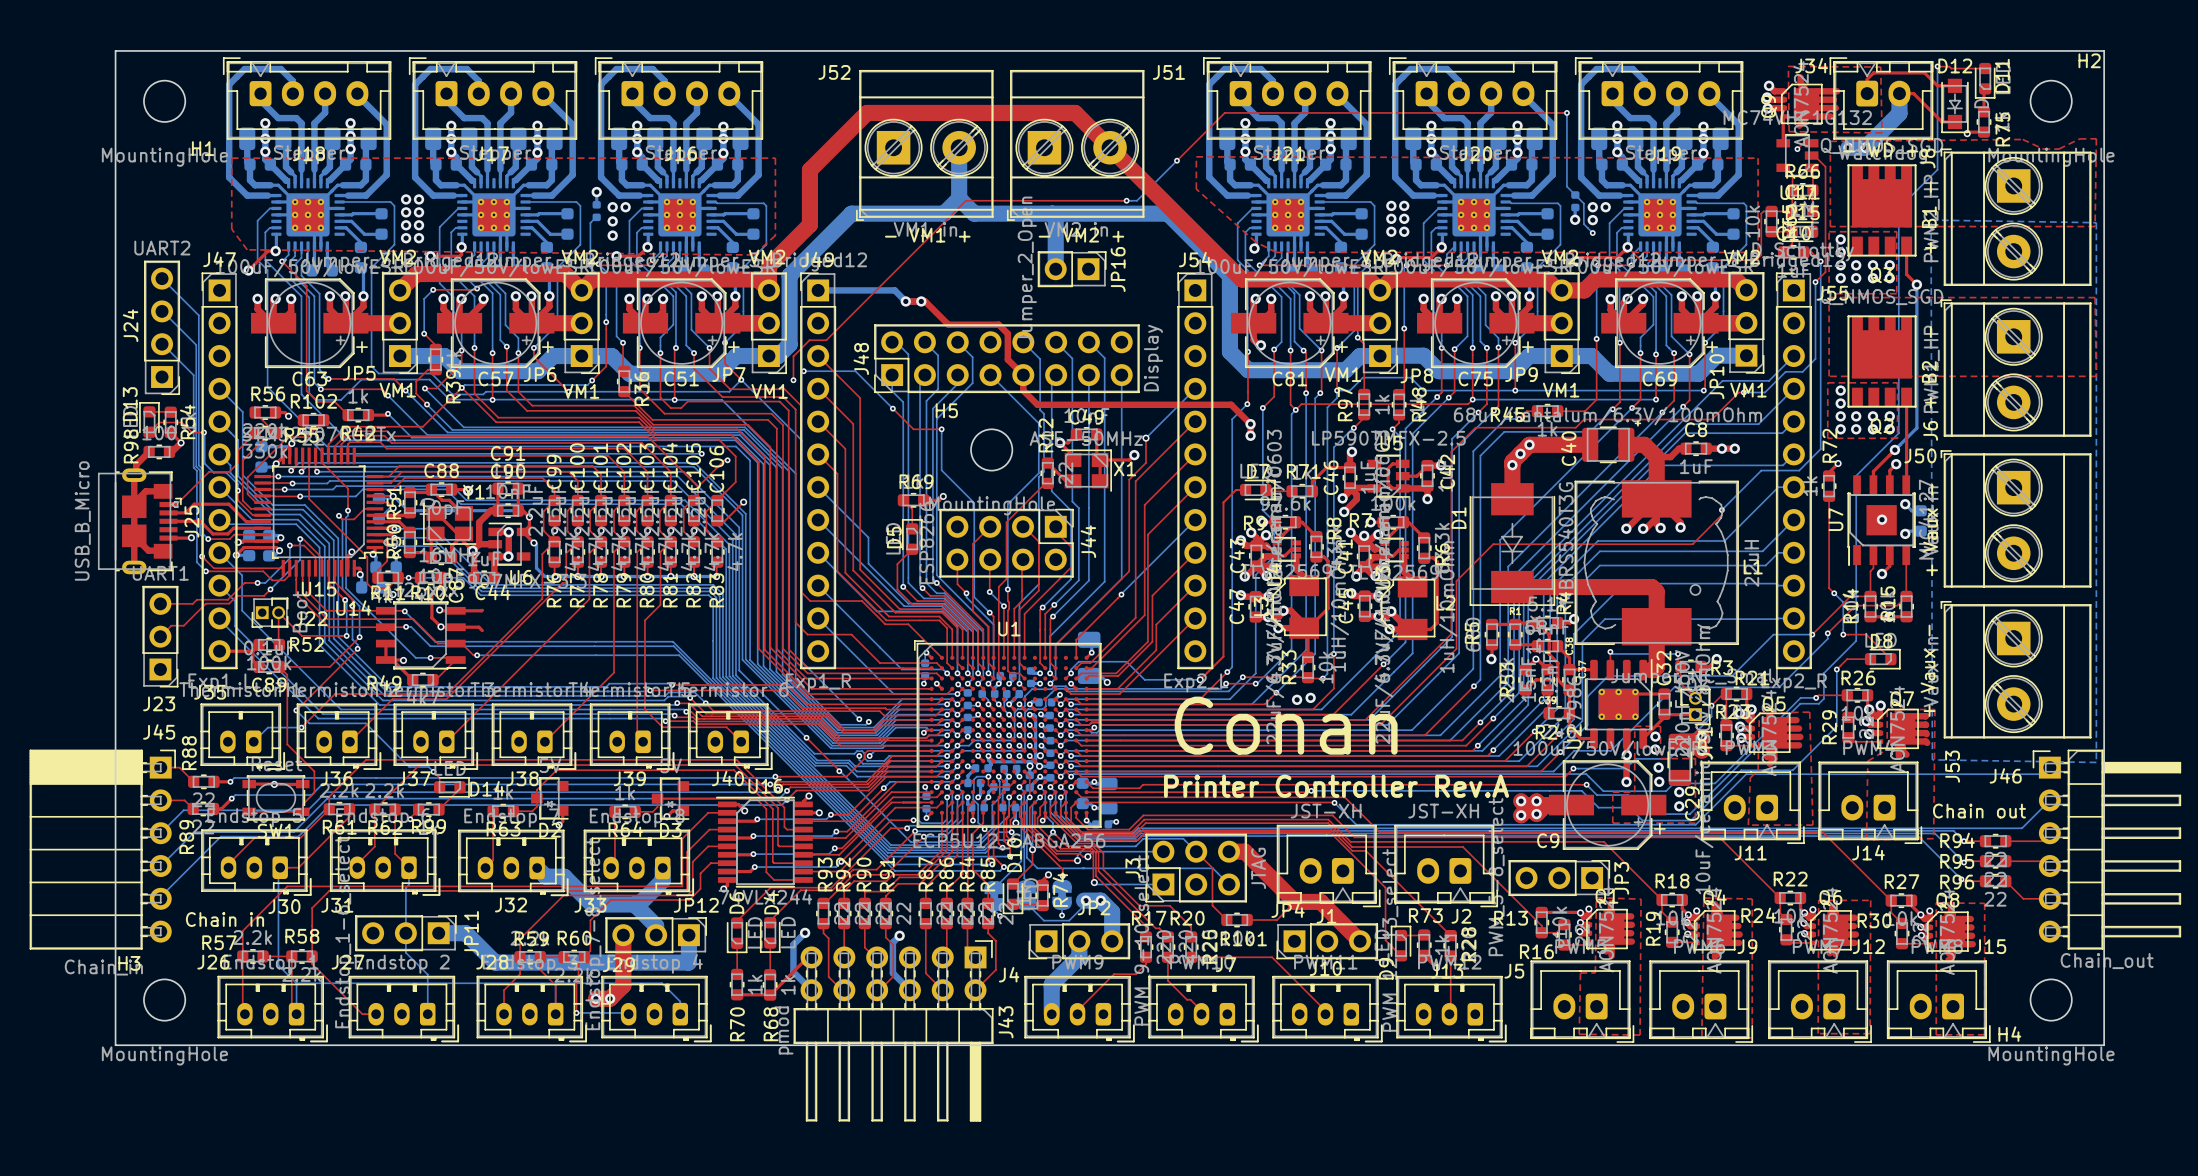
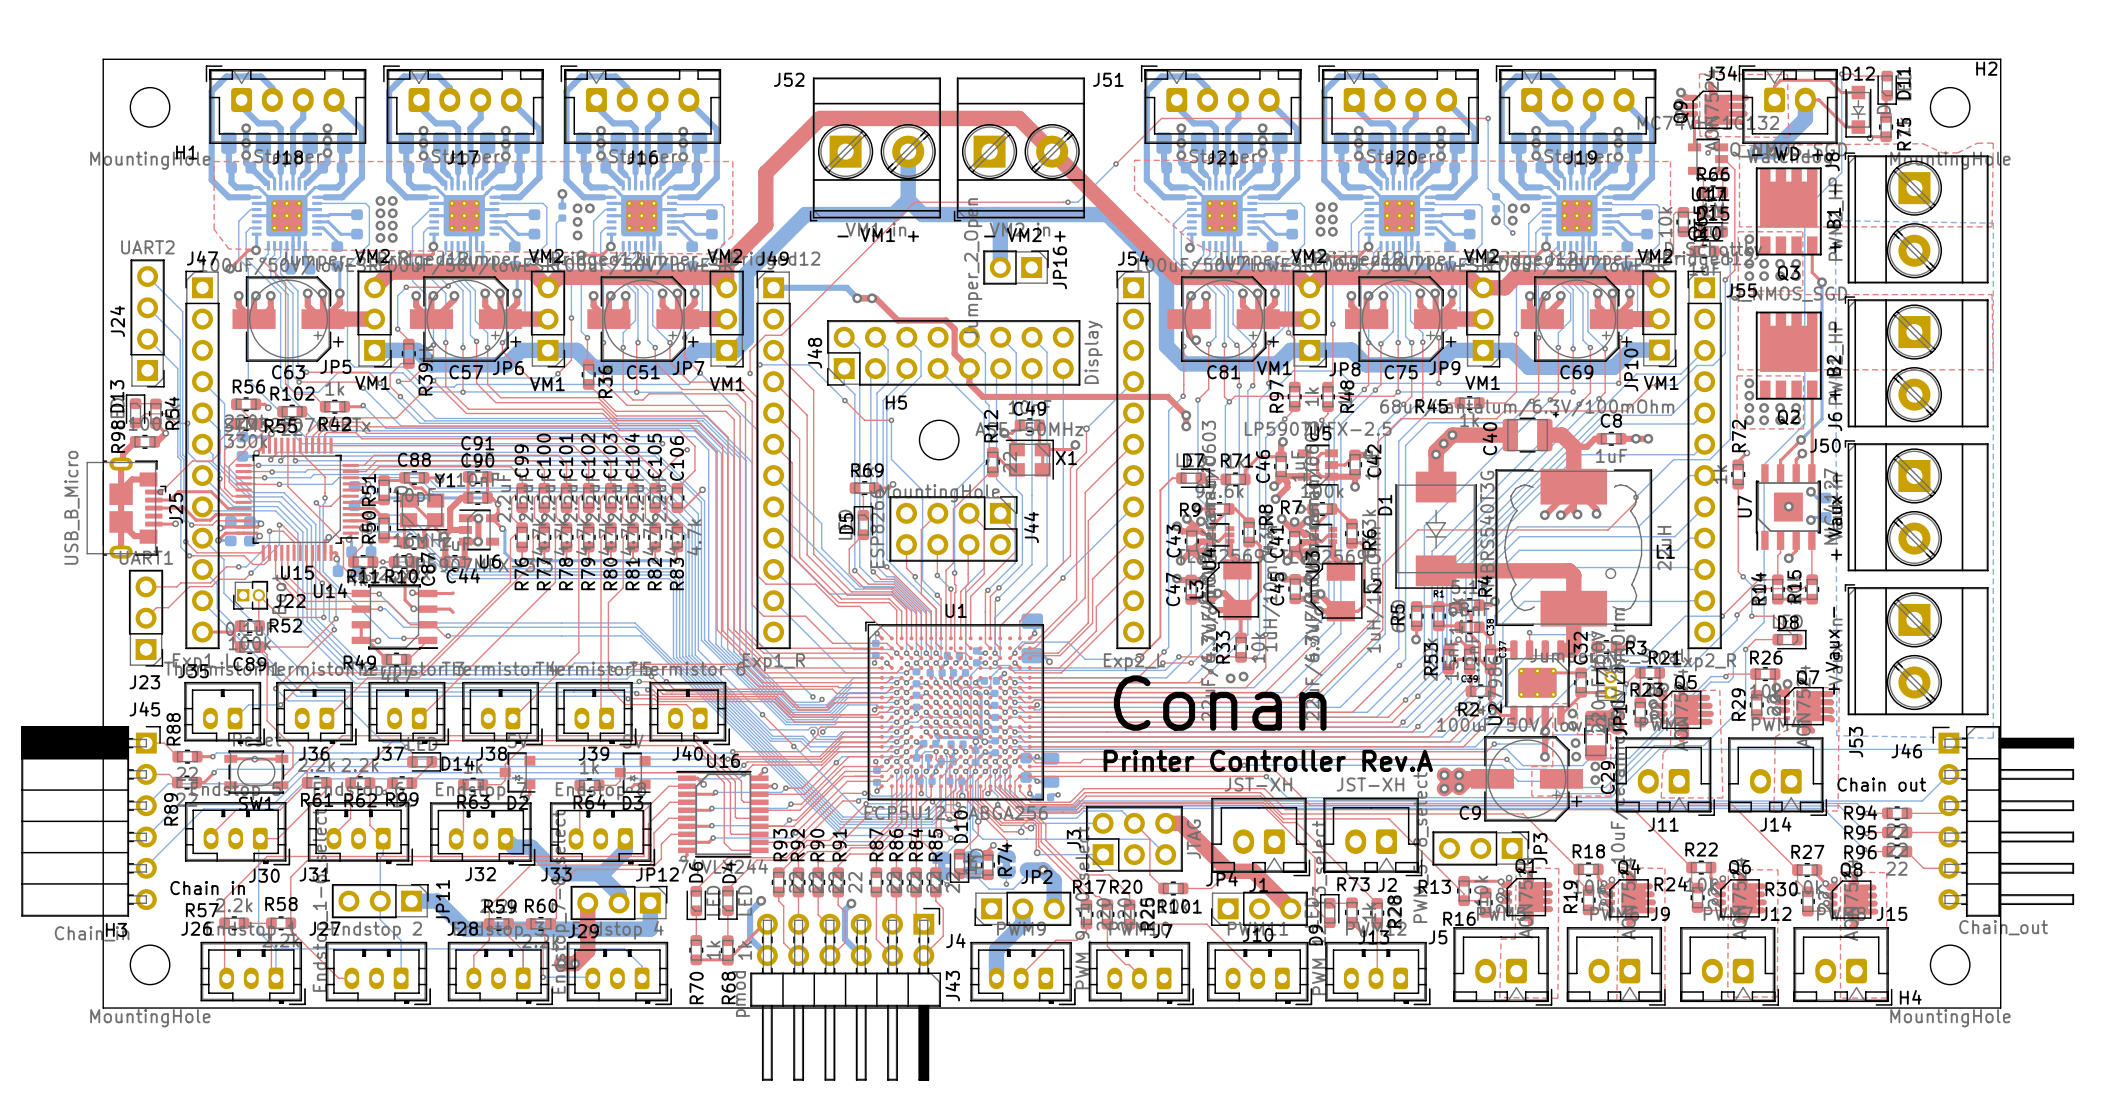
via: (1085, 900) -> none

